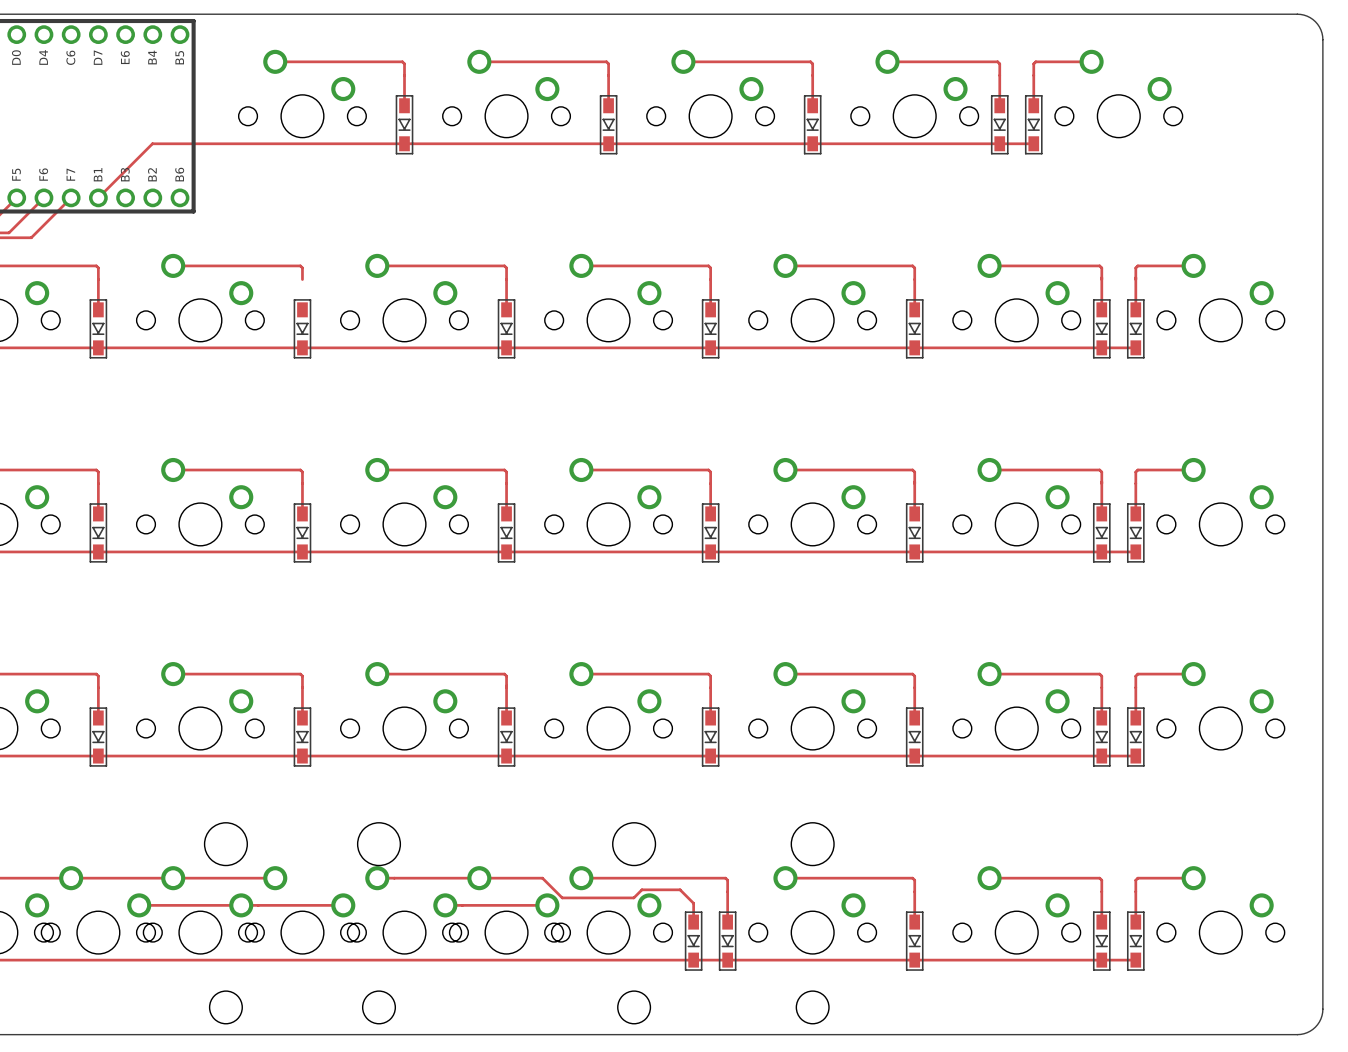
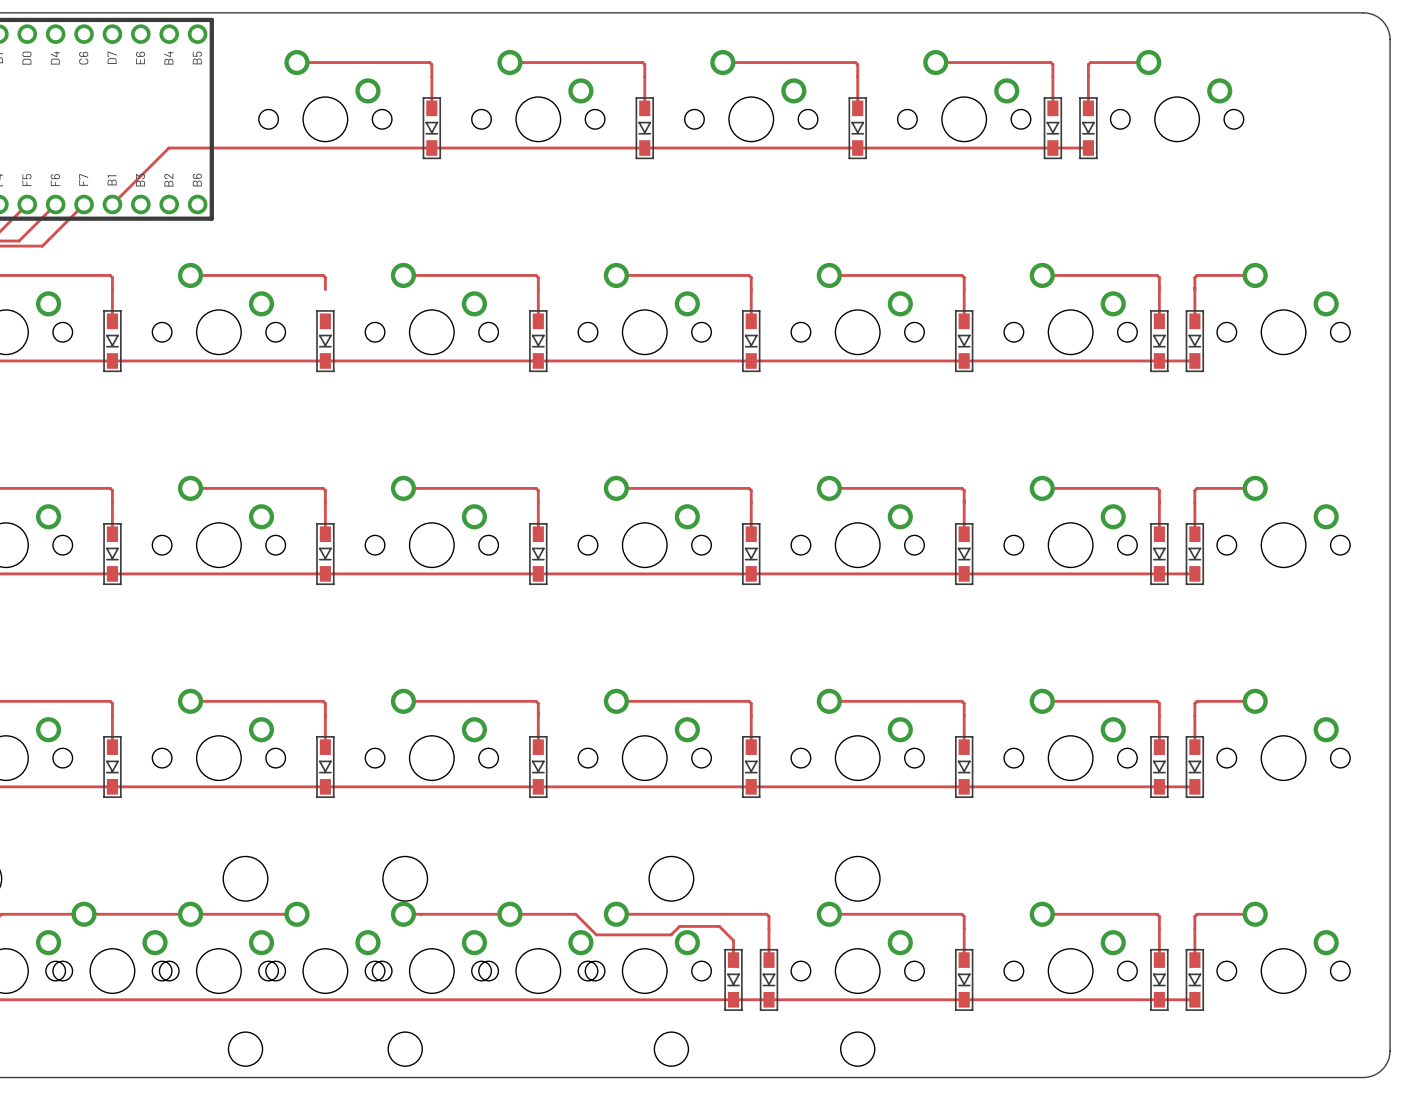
track: (139, 905) (343, 905) -> none
track: (445, 905) (547, 905) -> none

